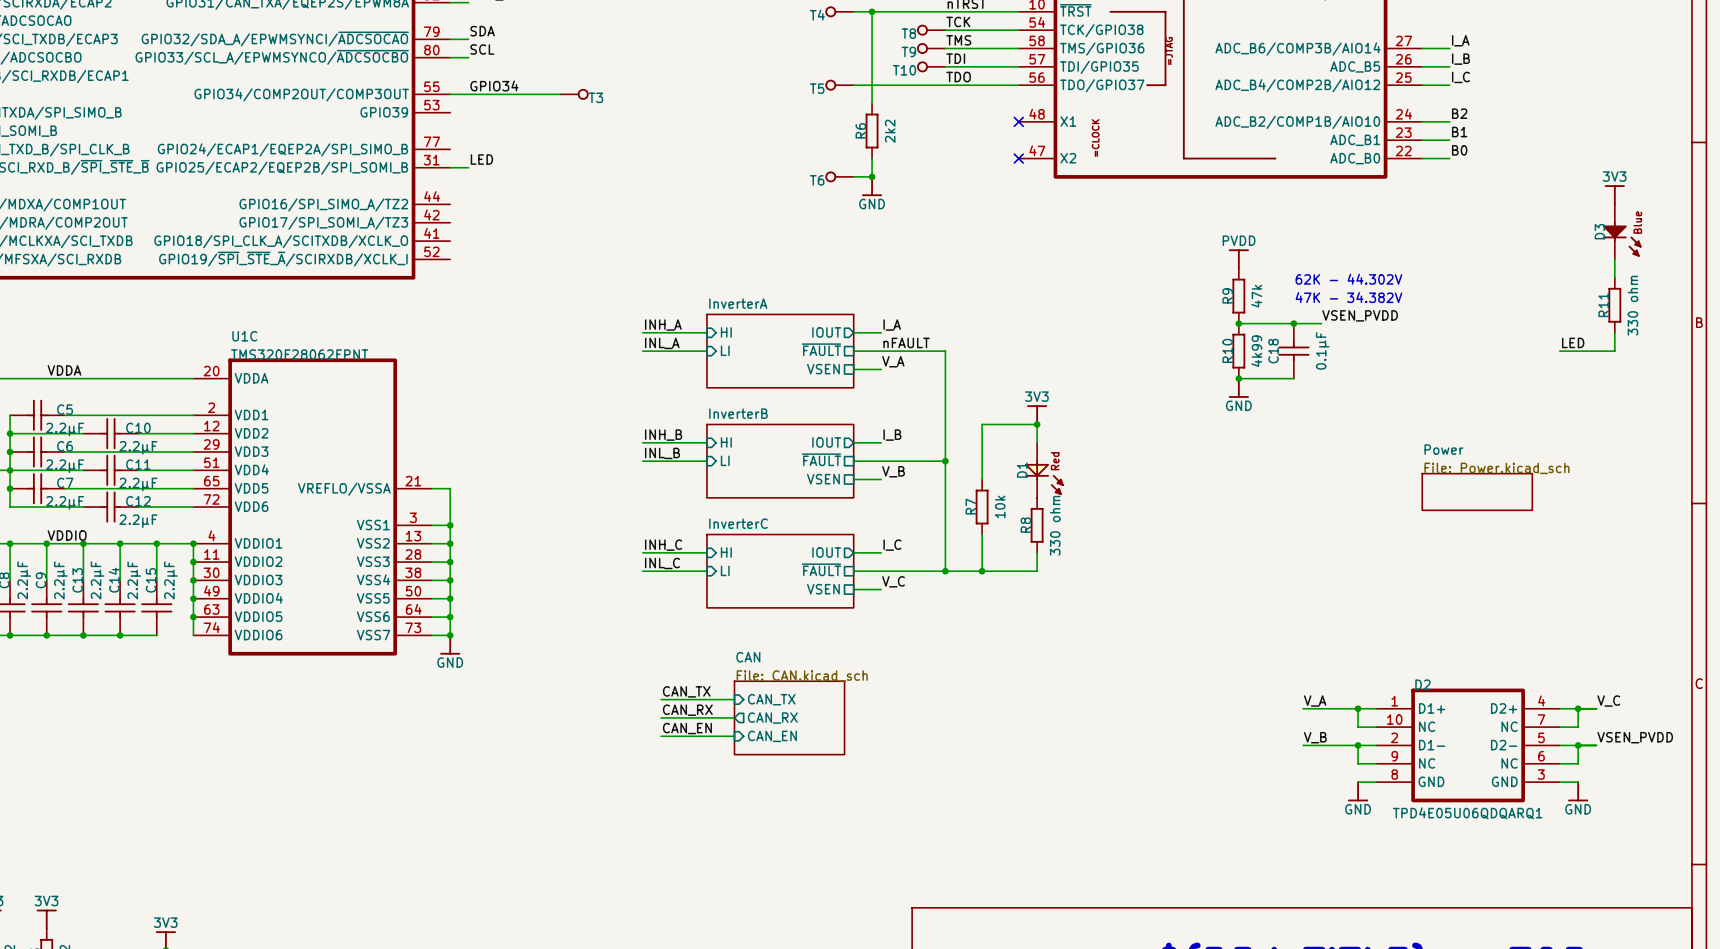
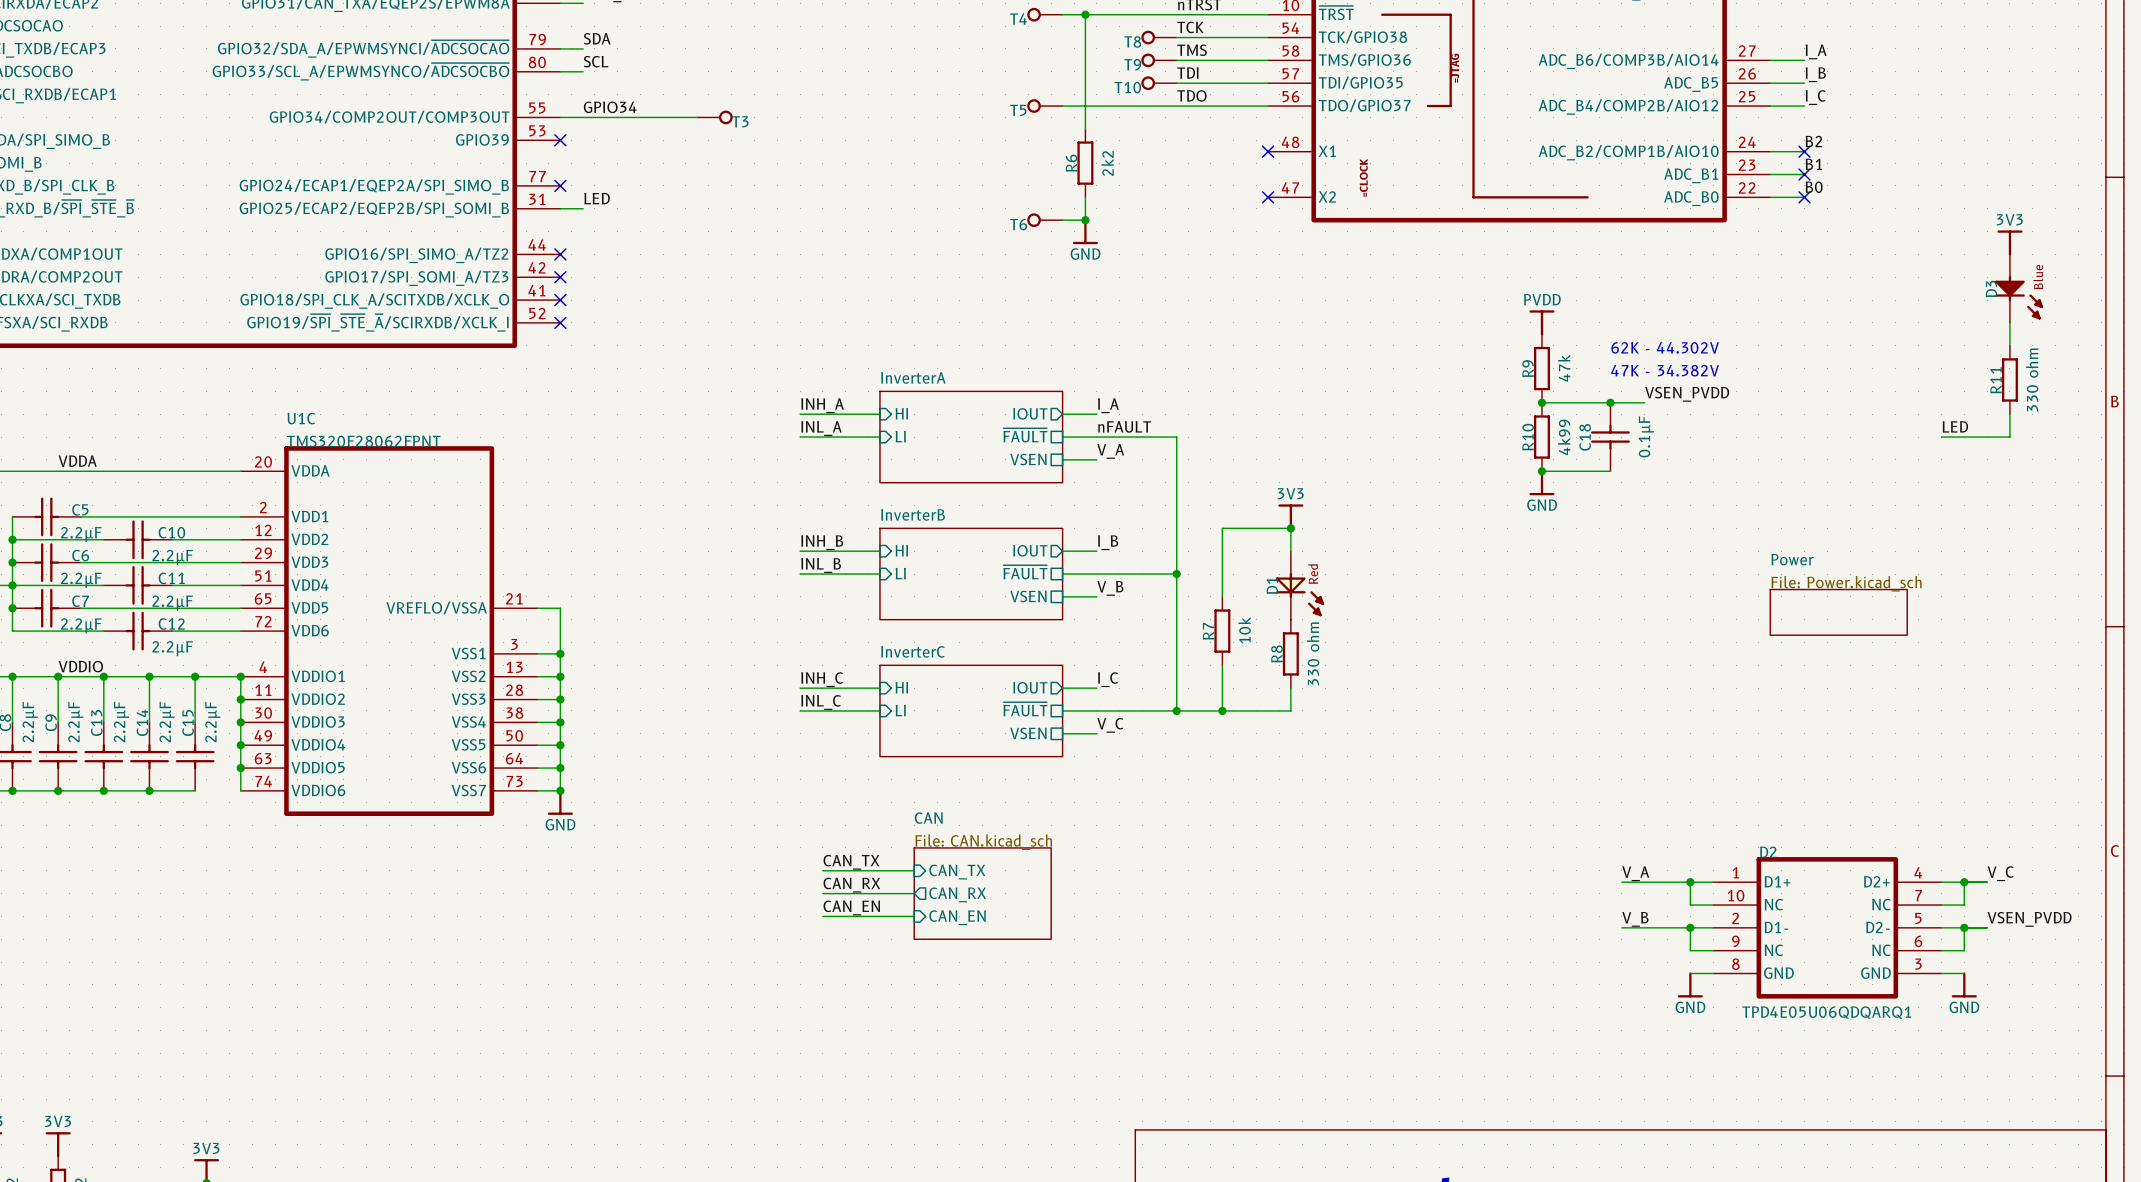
no-connect mark: none -> (560, 140)
no-connect mark: none -> (1804, 151)
no-connect mark: none -> (1804, 174)
no-connect mark: none -> (560, 185)
no-connect mark: none -> (1804, 197)
no-connect mark: none -> (560, 254)
no-connect mark: none -> (560, 277)
no-connect mark: none -> (560, 300)
no-connect mark: none -> (560, 322)

